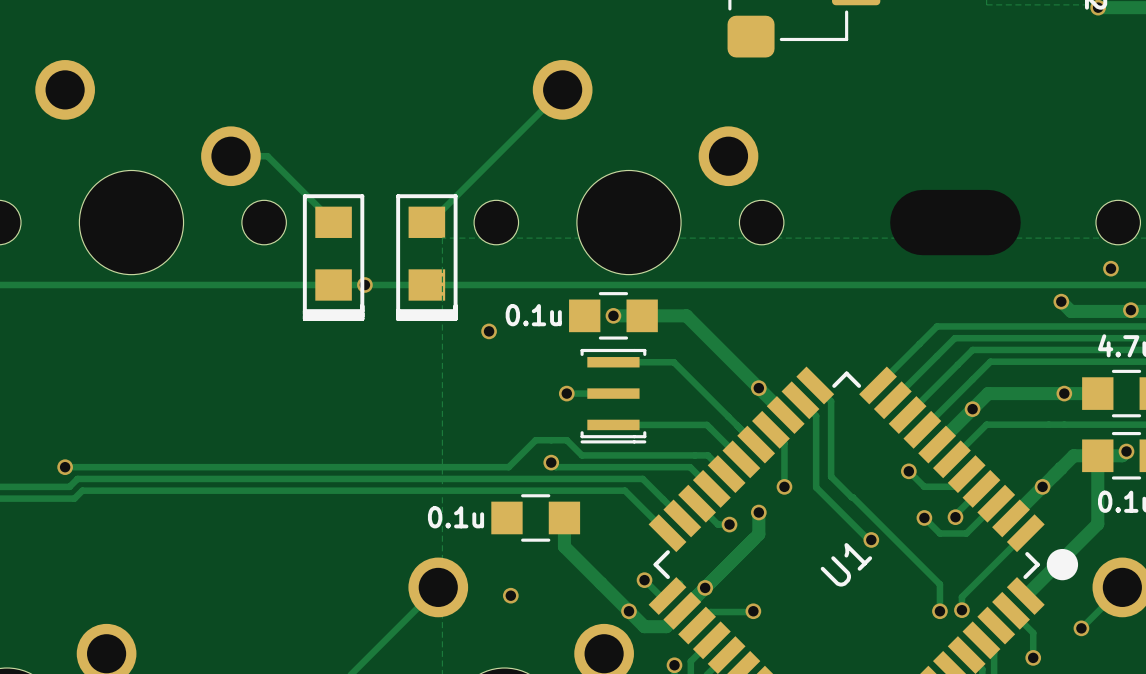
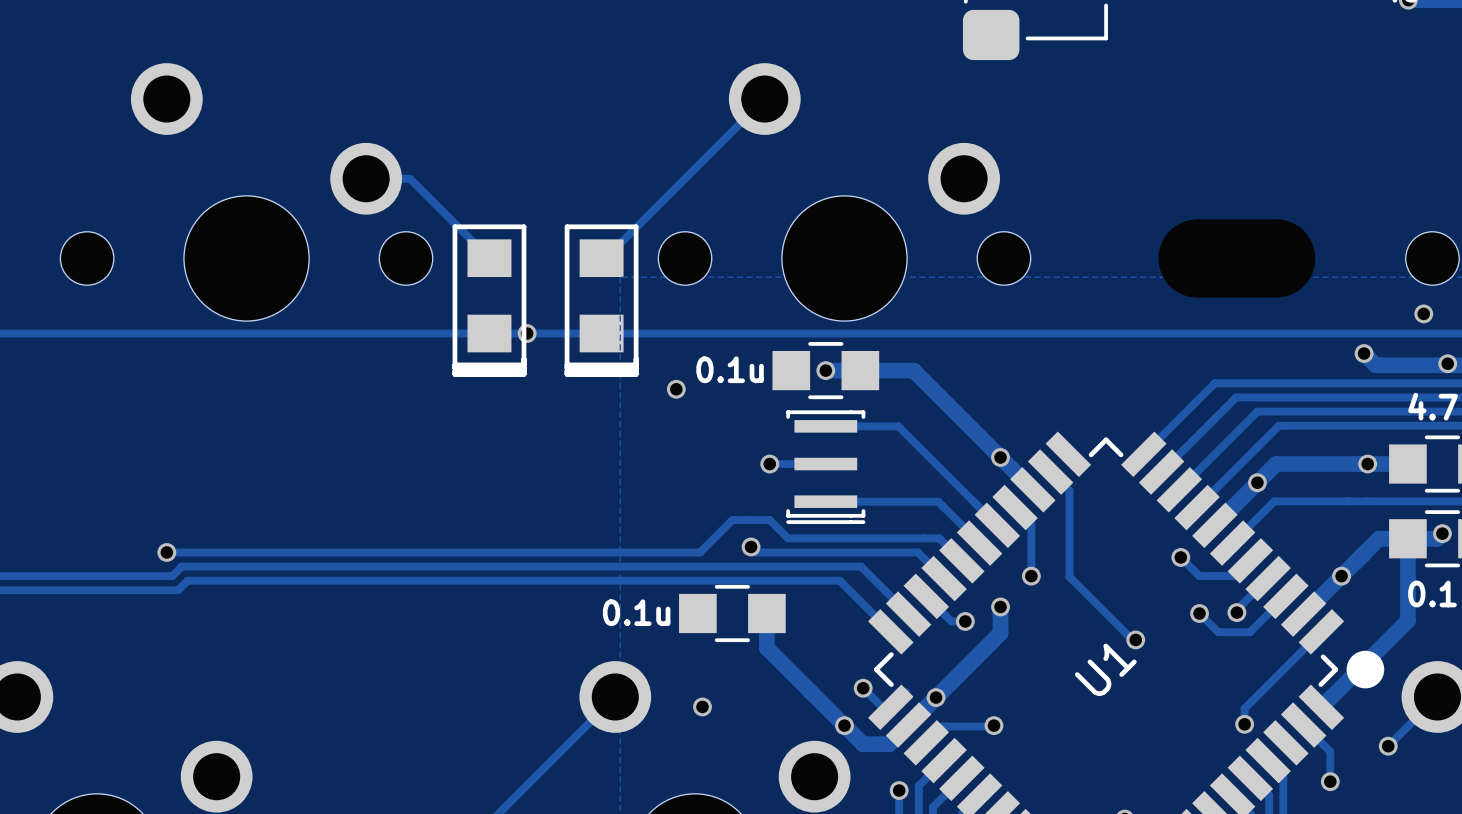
track: (815, 385) (831, 401) (831, 476) (939, 584) (939, 611) -> none
via: (939, 611) -> none

